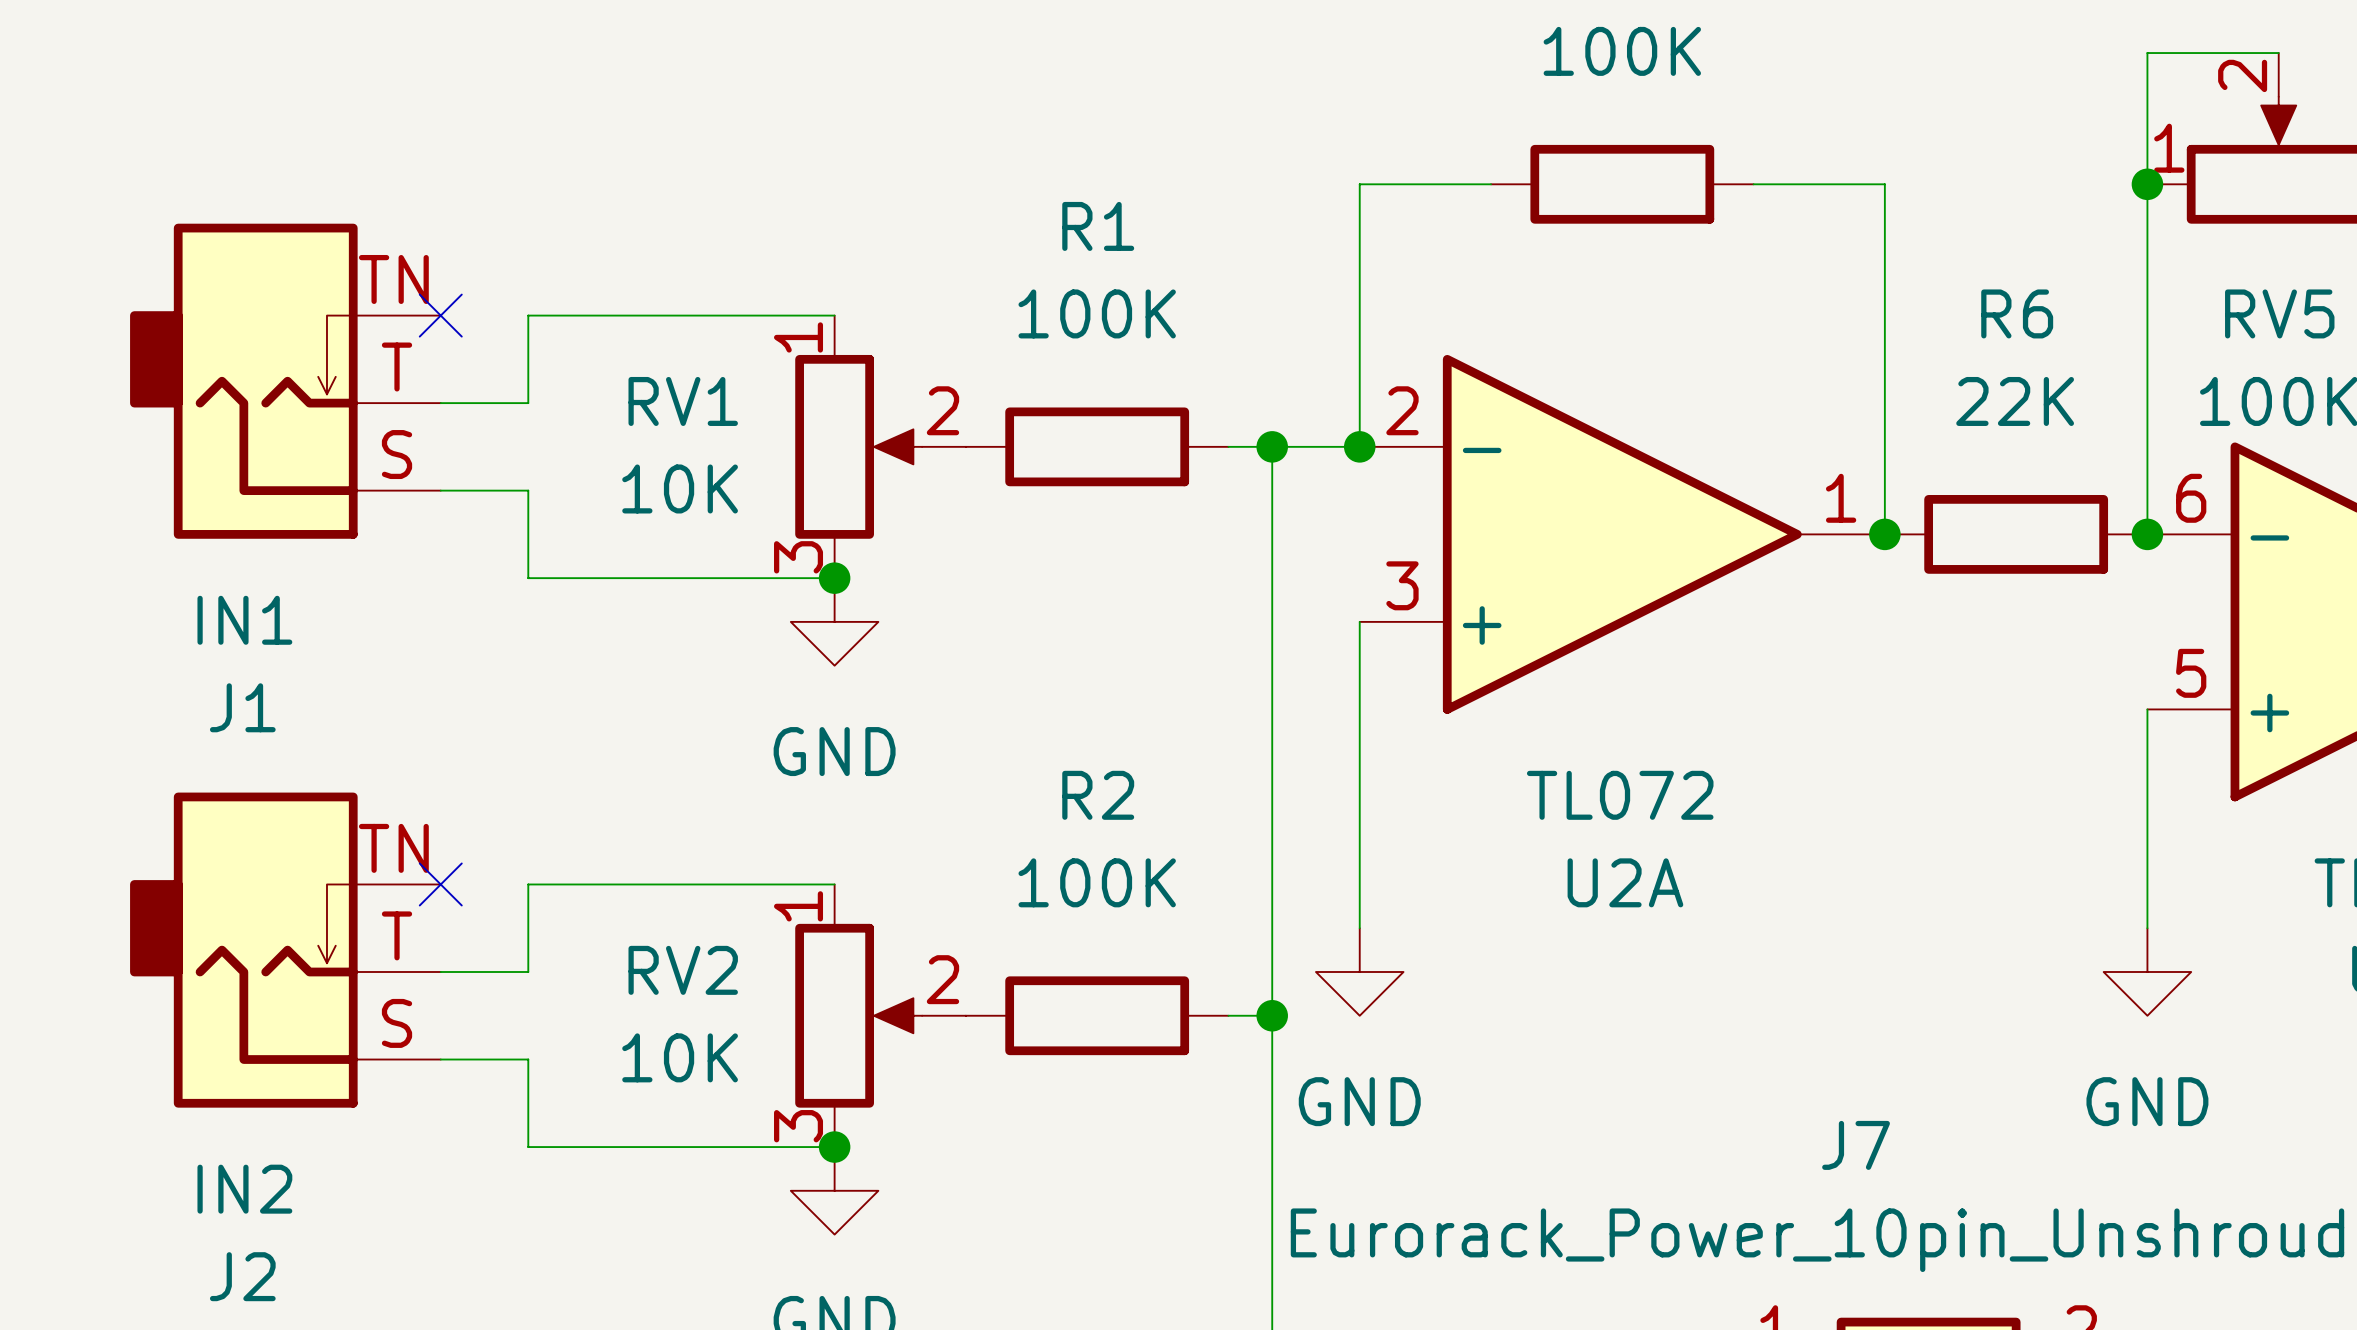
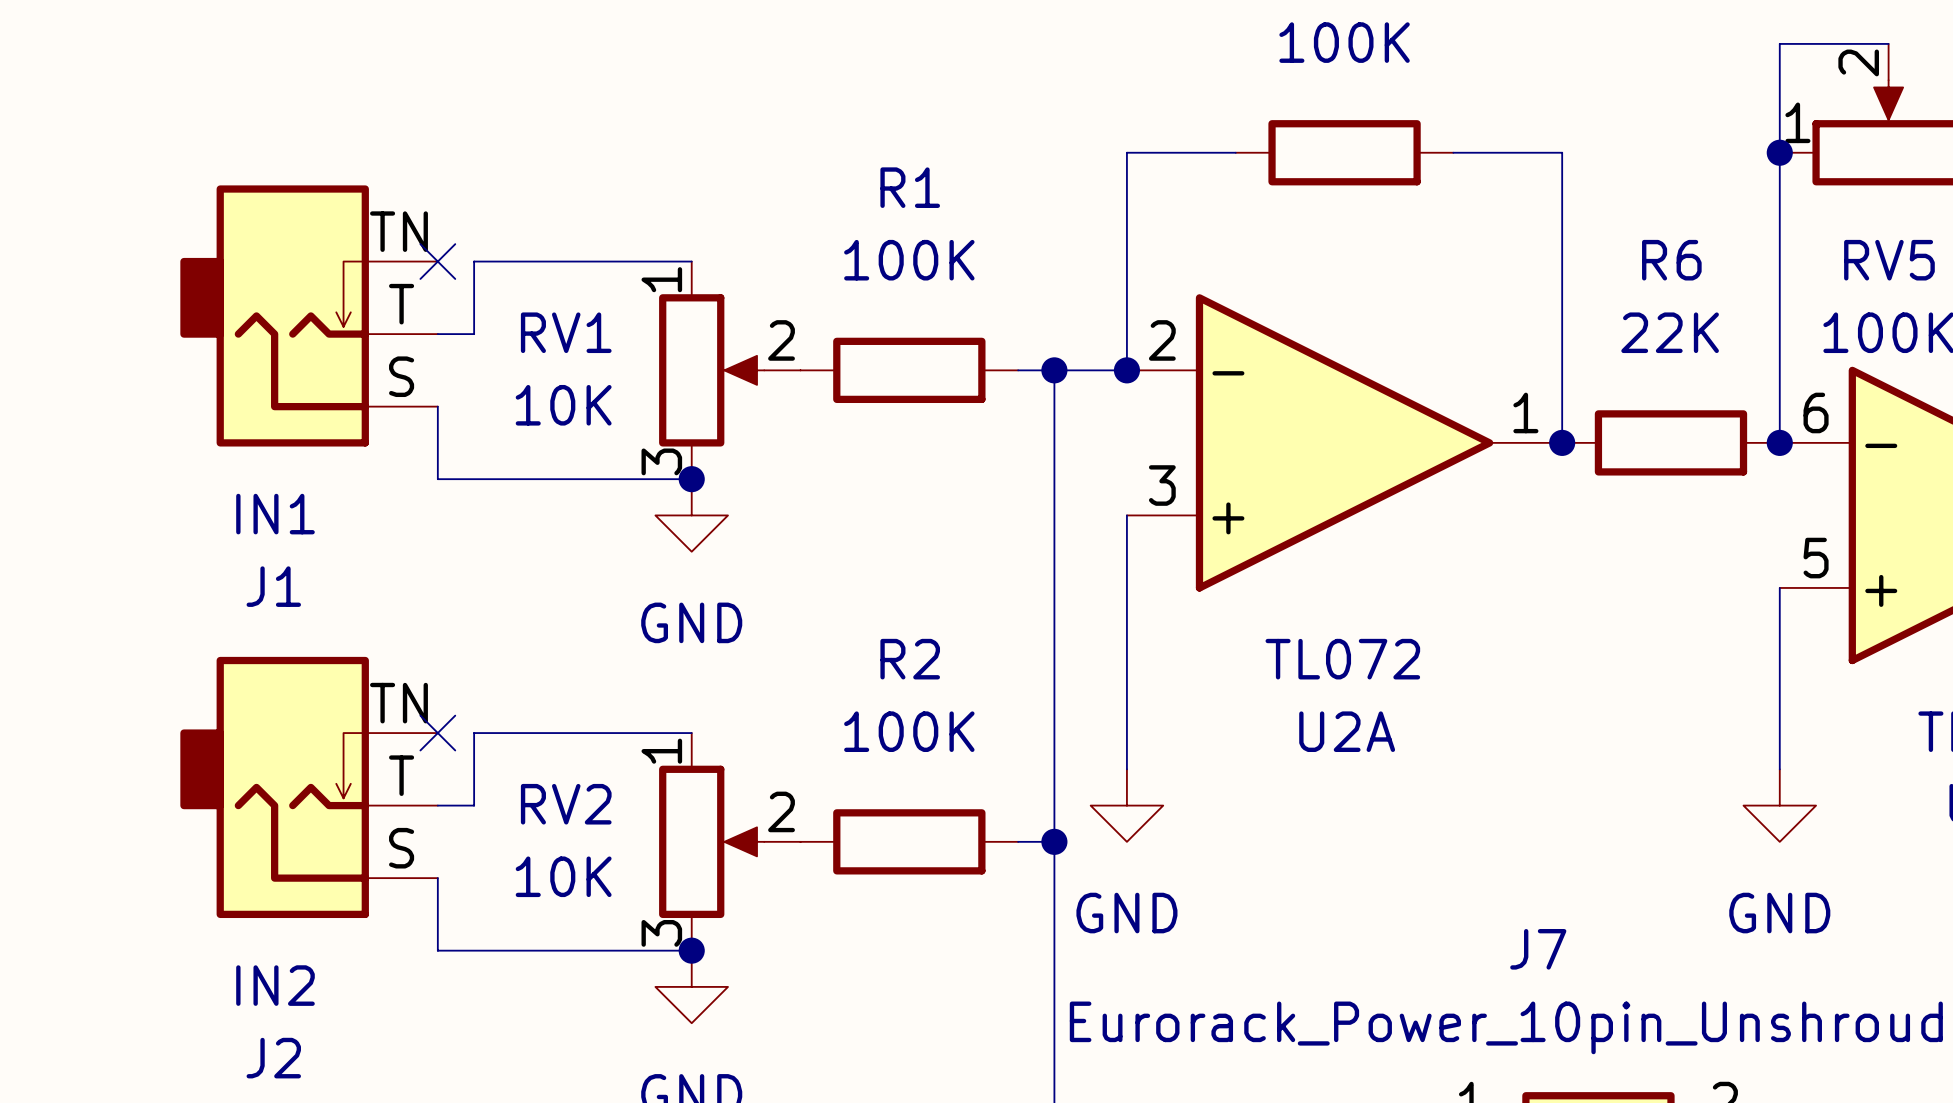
no-connect mark position: (440, 315) -> (437, 261)
wire: (572, 315) (528, 315) (528, 403) (440, 403) -> (474, 261) (474, 334) (437, 334)
J1 position: (285, 381) -> (309, 315)
no-connect mark position: (440, 884) -> (437, 733)
wire: (572, 884) (528, 884) (528, 971) (440, 971) -> (474, 733) (474, 805) (437, 805)
J2 position: (285, 950) -> (309, 787)

